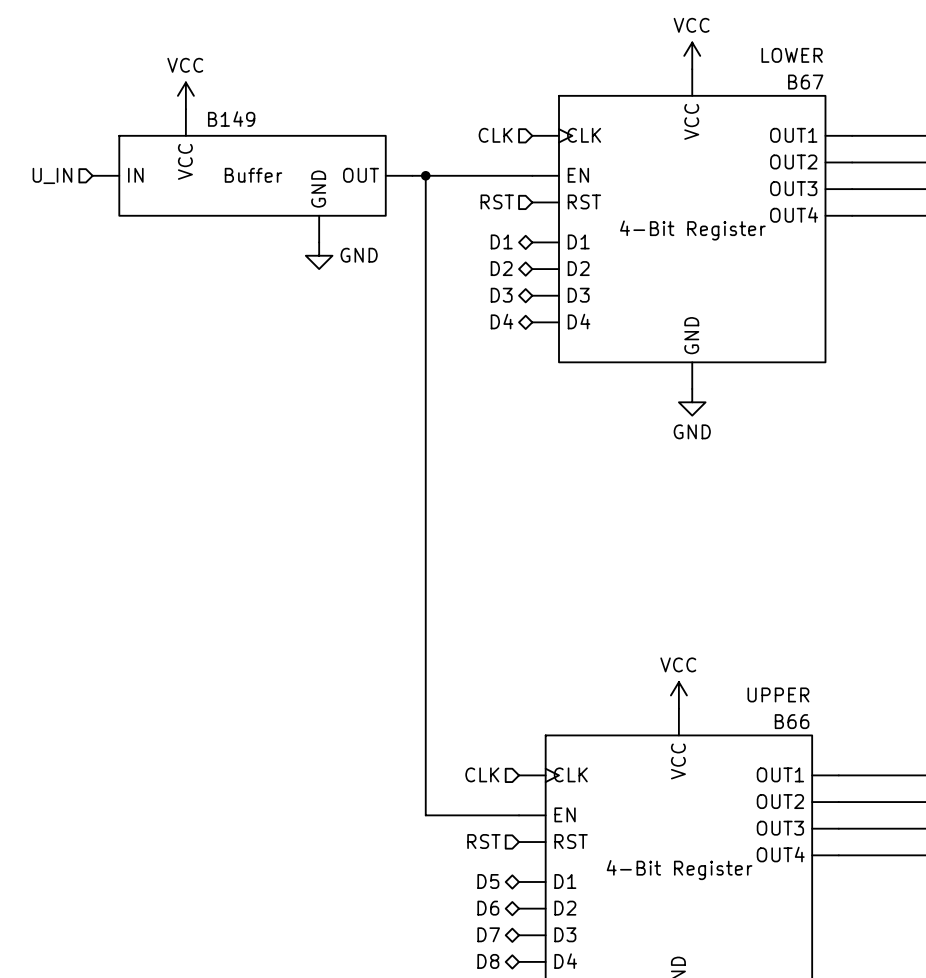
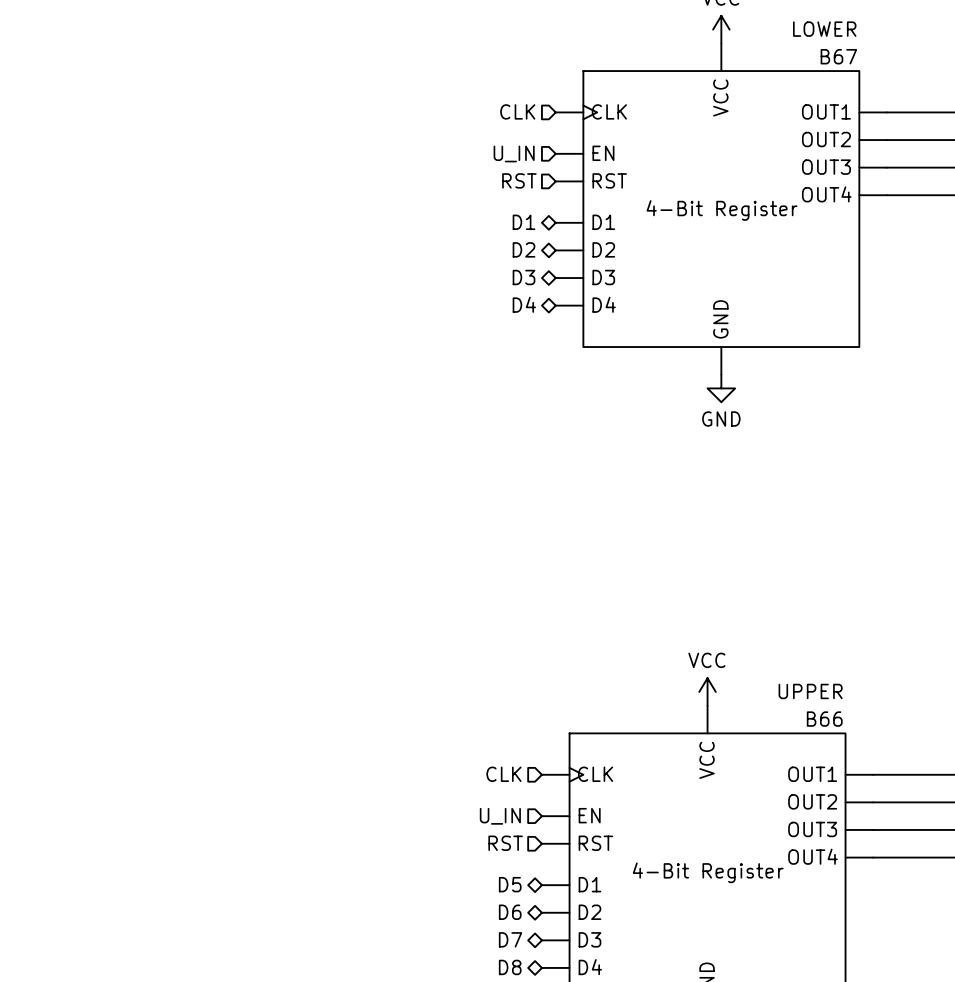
power symbol: VCC (185, 95) -> none
hierarchical label: U_IN (52, 175) -> none
B149: (252, 175) -> none
wire: (412, 175) (532, 175) -> none
wire: (425, 175) (425, 815) (519, 815) -> none
junction: (425, 175) -> none
hierarchical label: none -> U_IN (514, 153)
power symbol: GND (319, 255) -> none
hierarchical label: none -> U_IN (500, 816)

